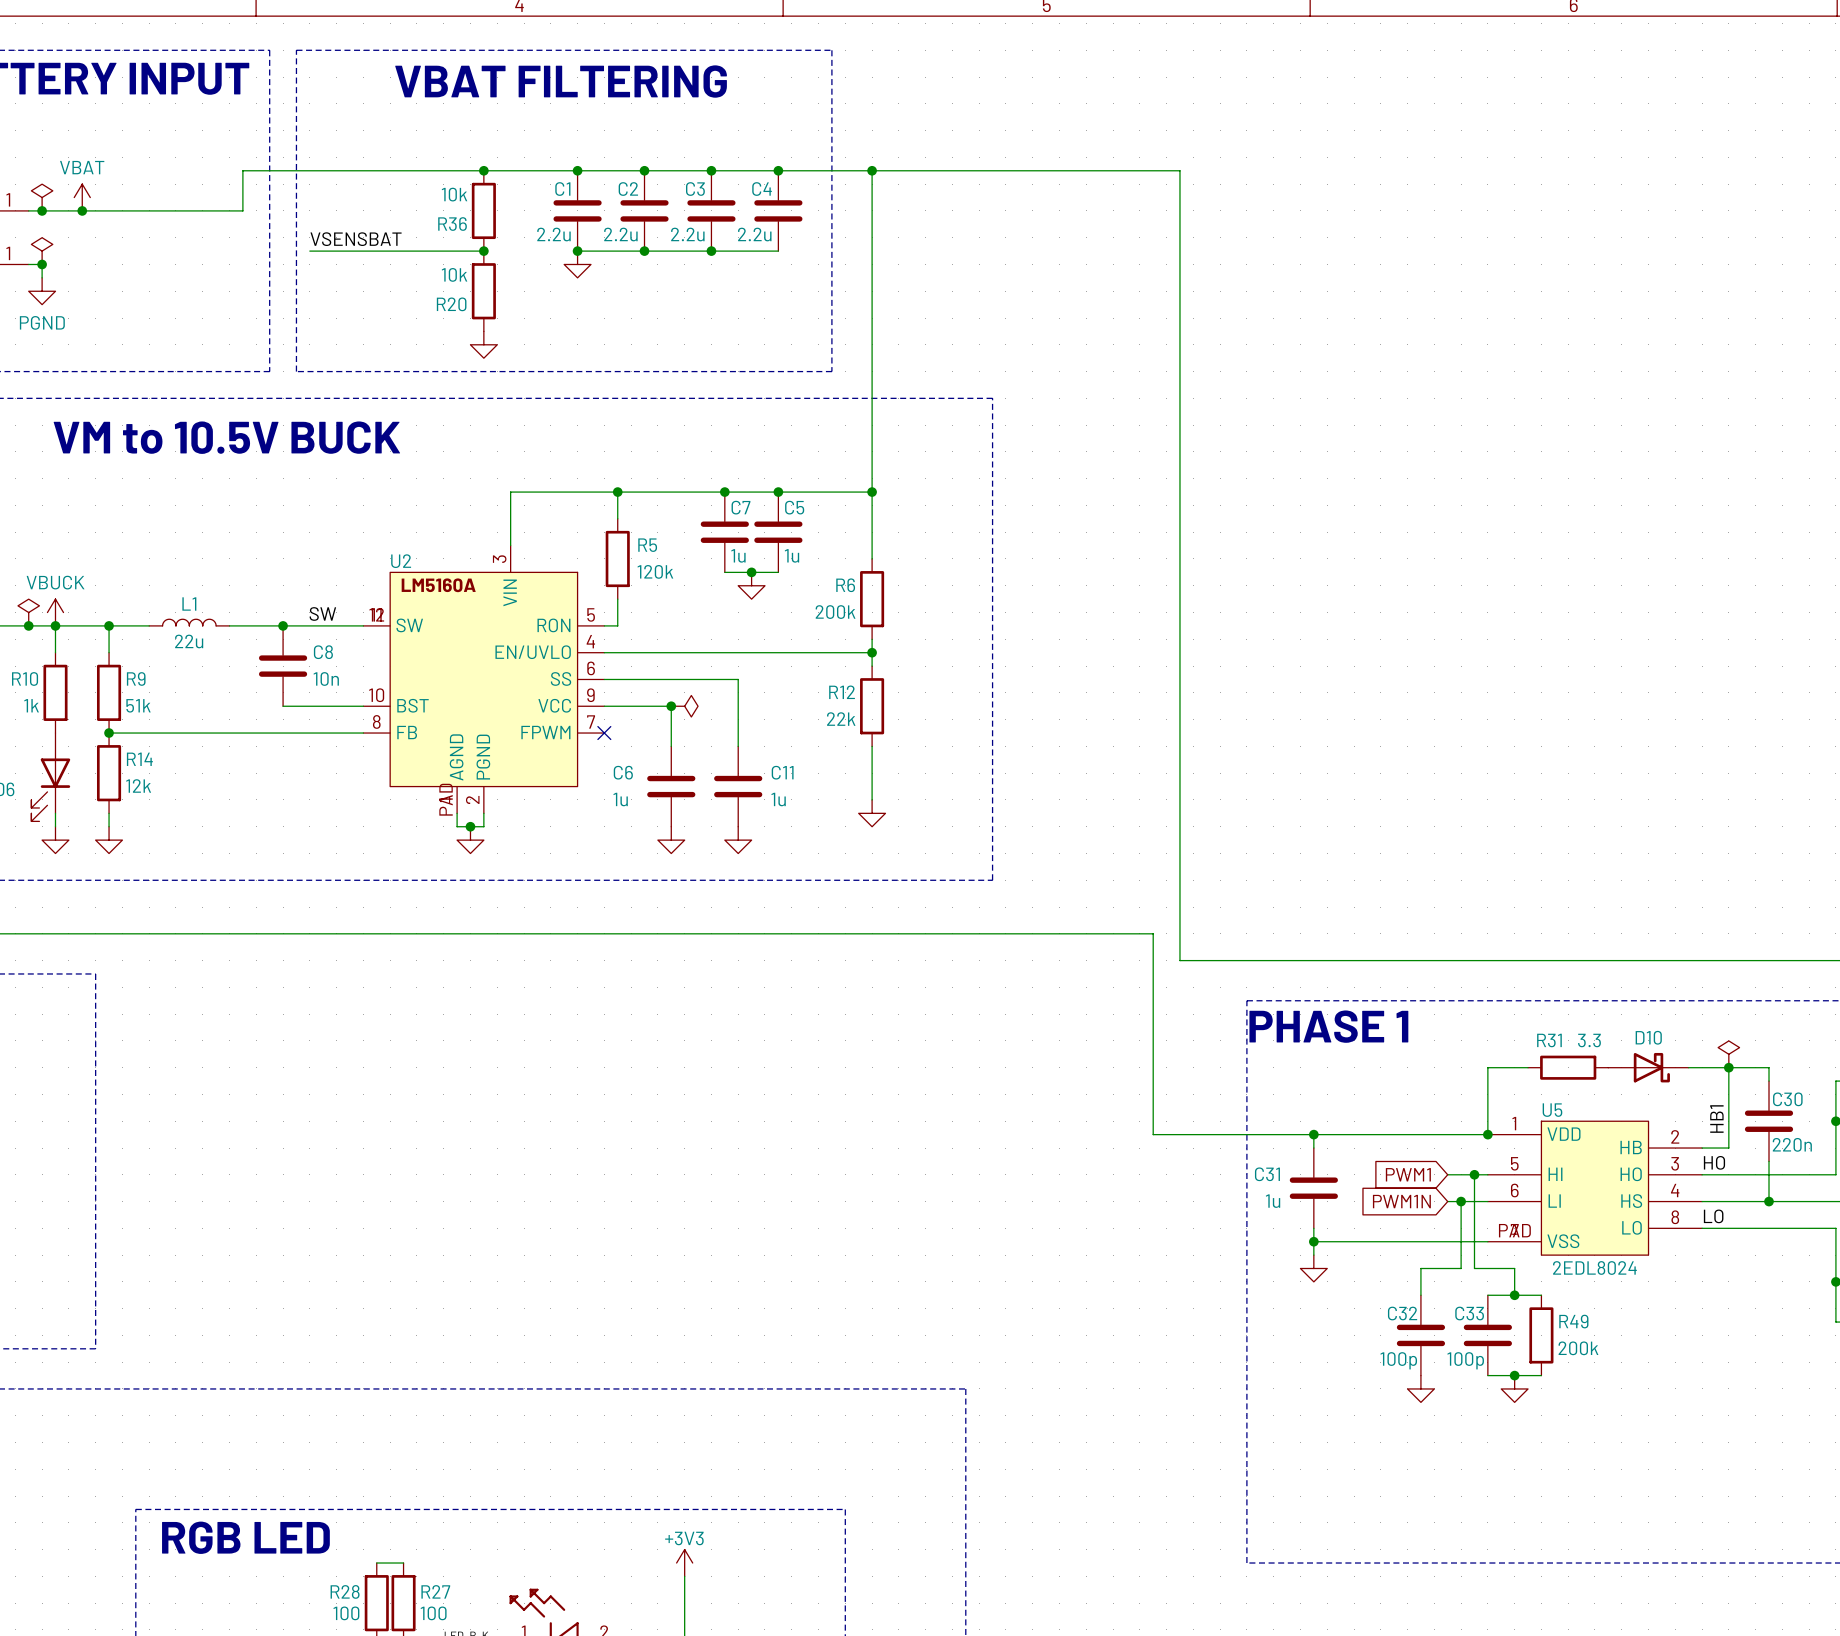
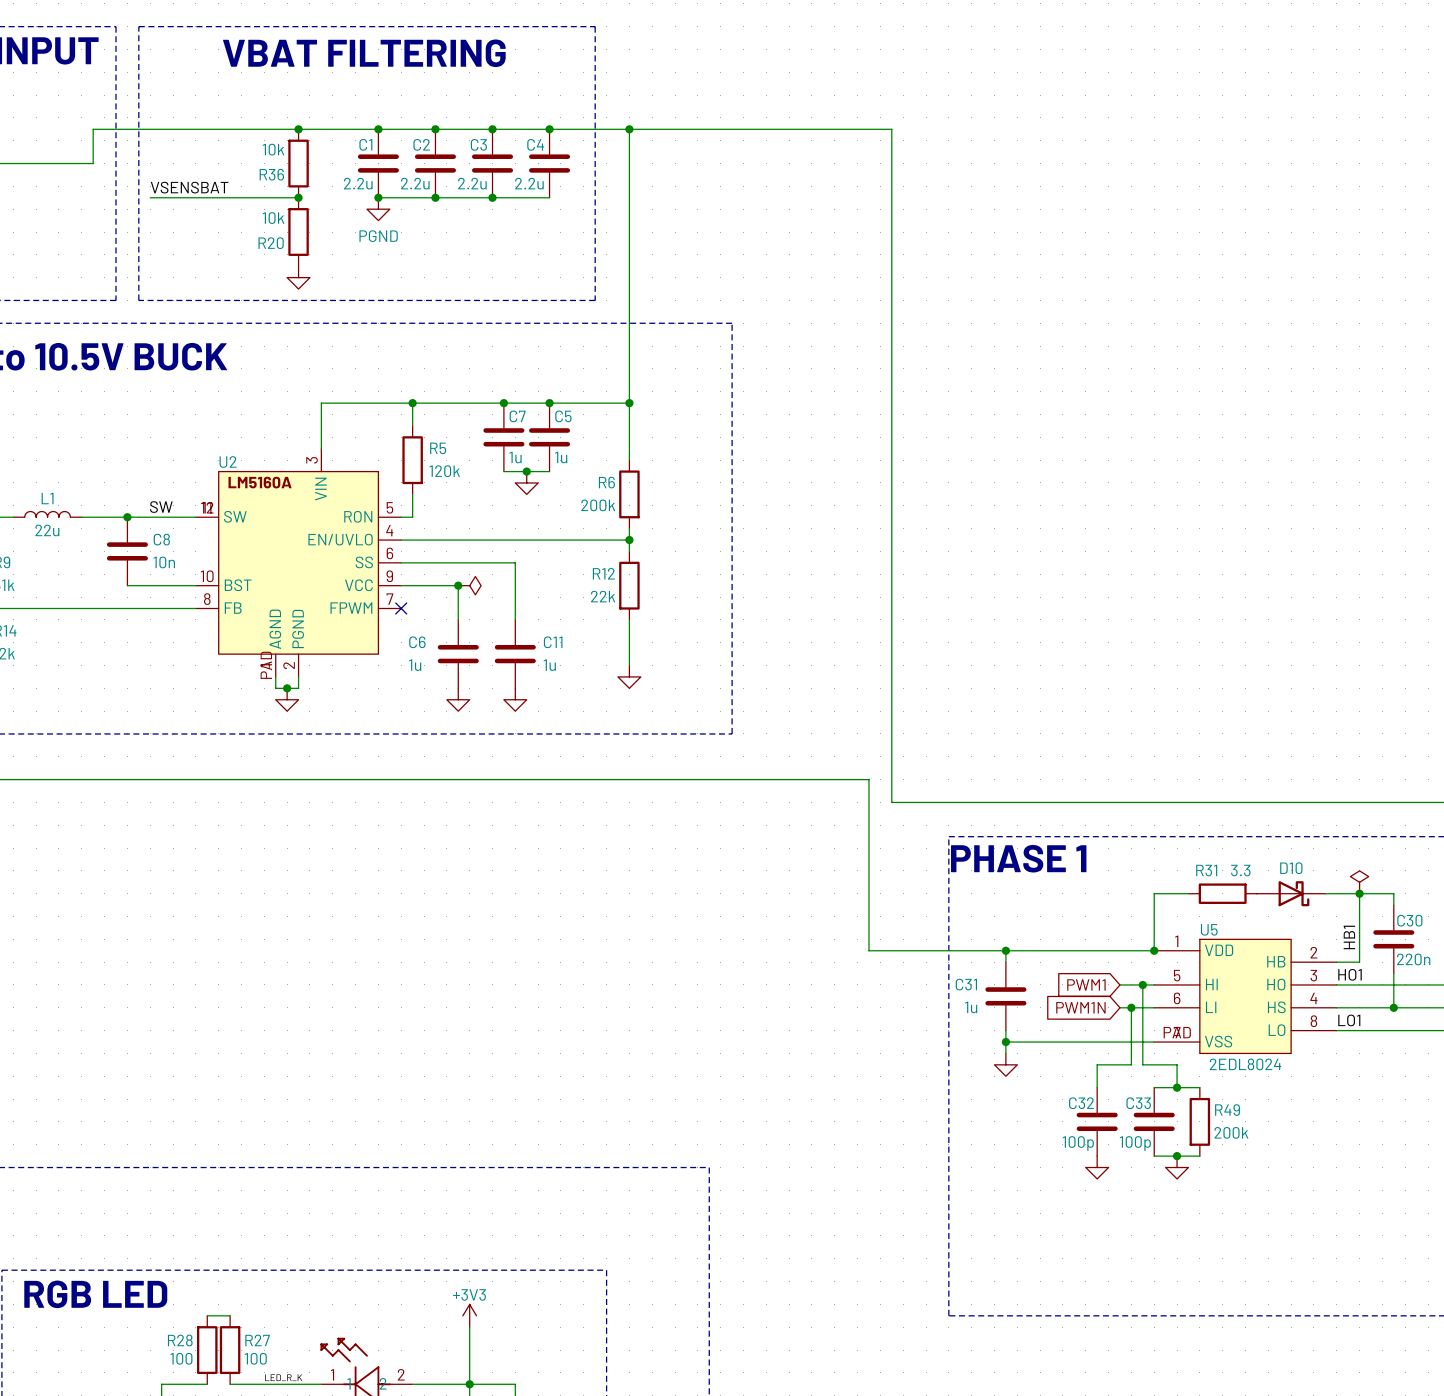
power symbol text: none -> PGND (378, 236)
label: HO (1714, 1162) -> HO1 (1350, 974)
label: LO (1713, 1216) -> LO1 (1349, 1020)

